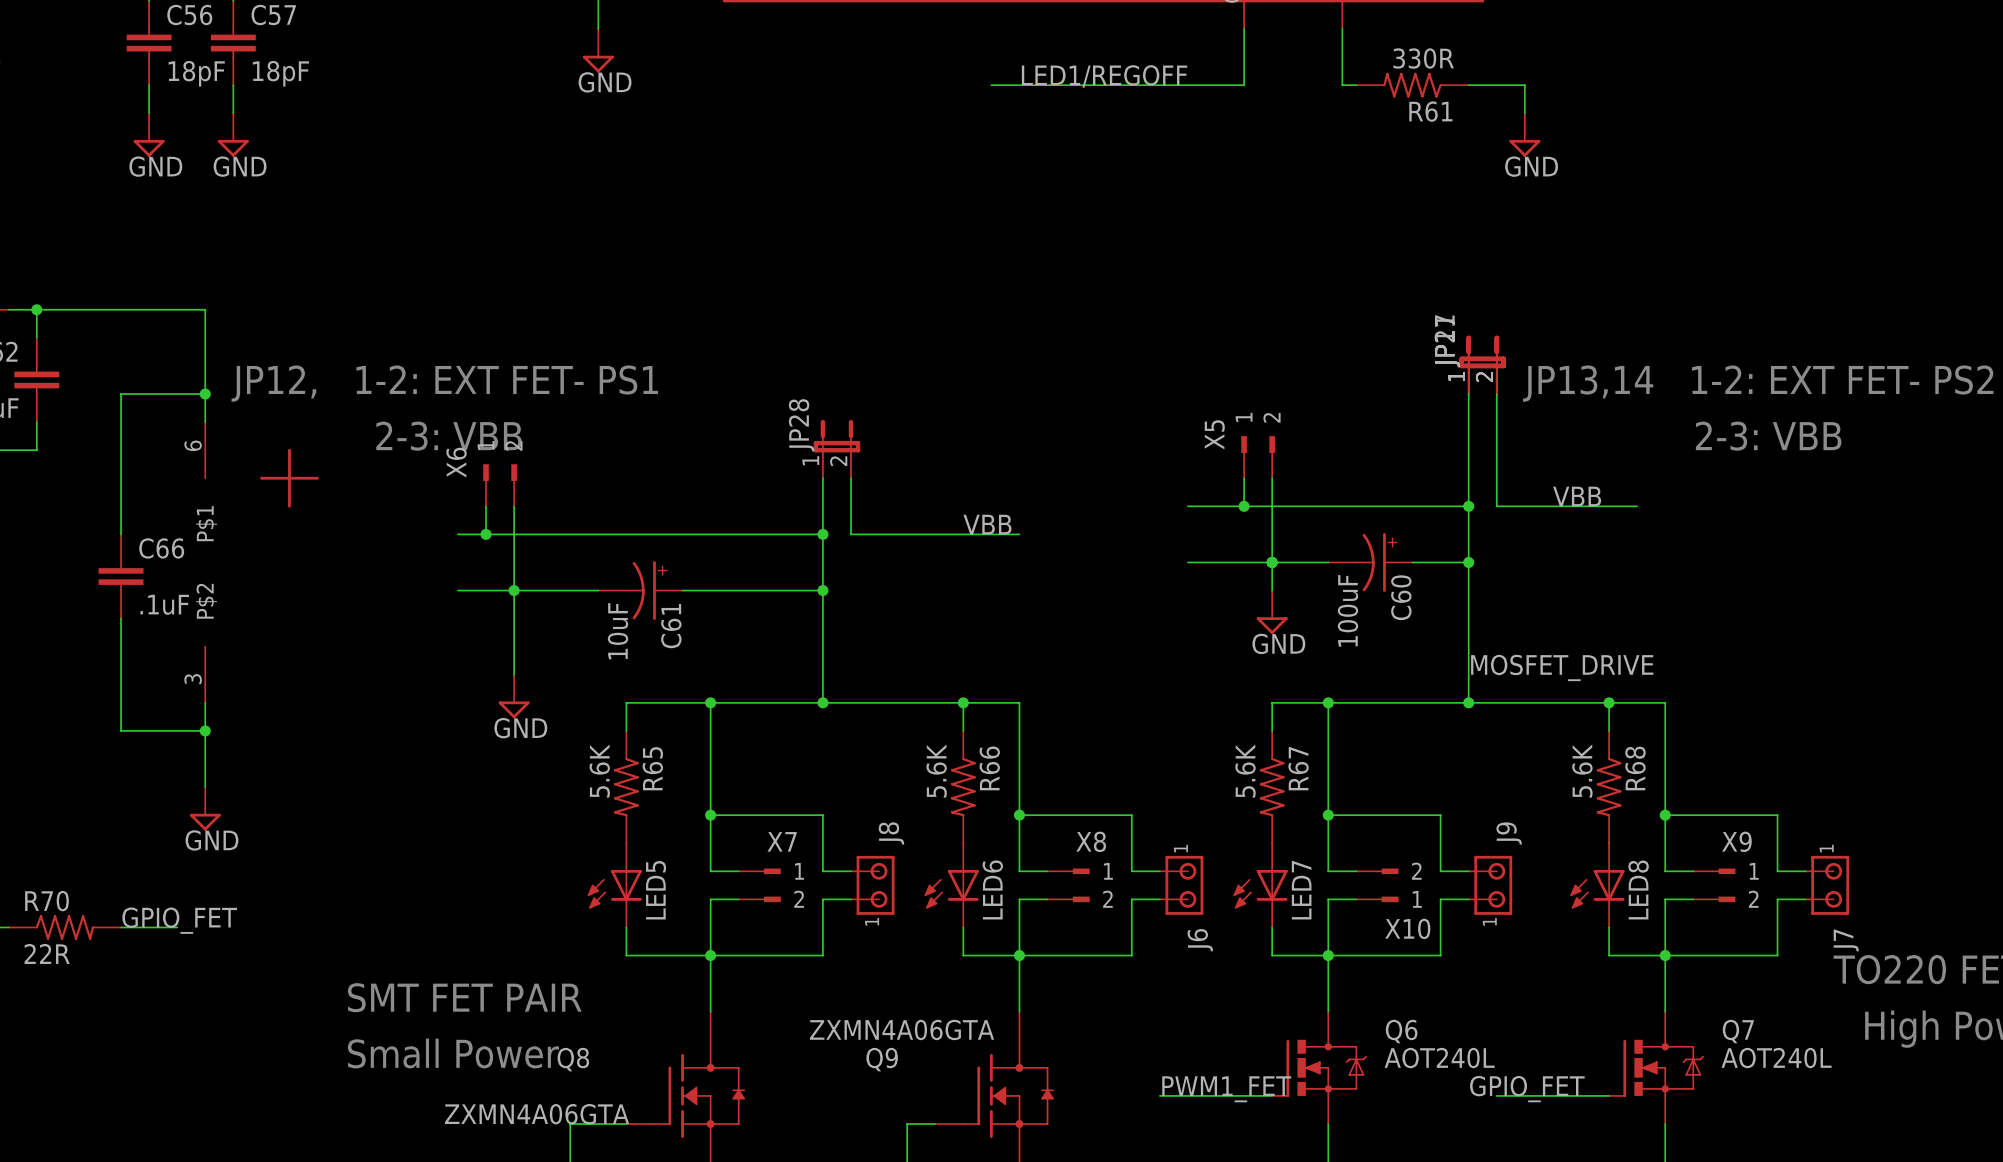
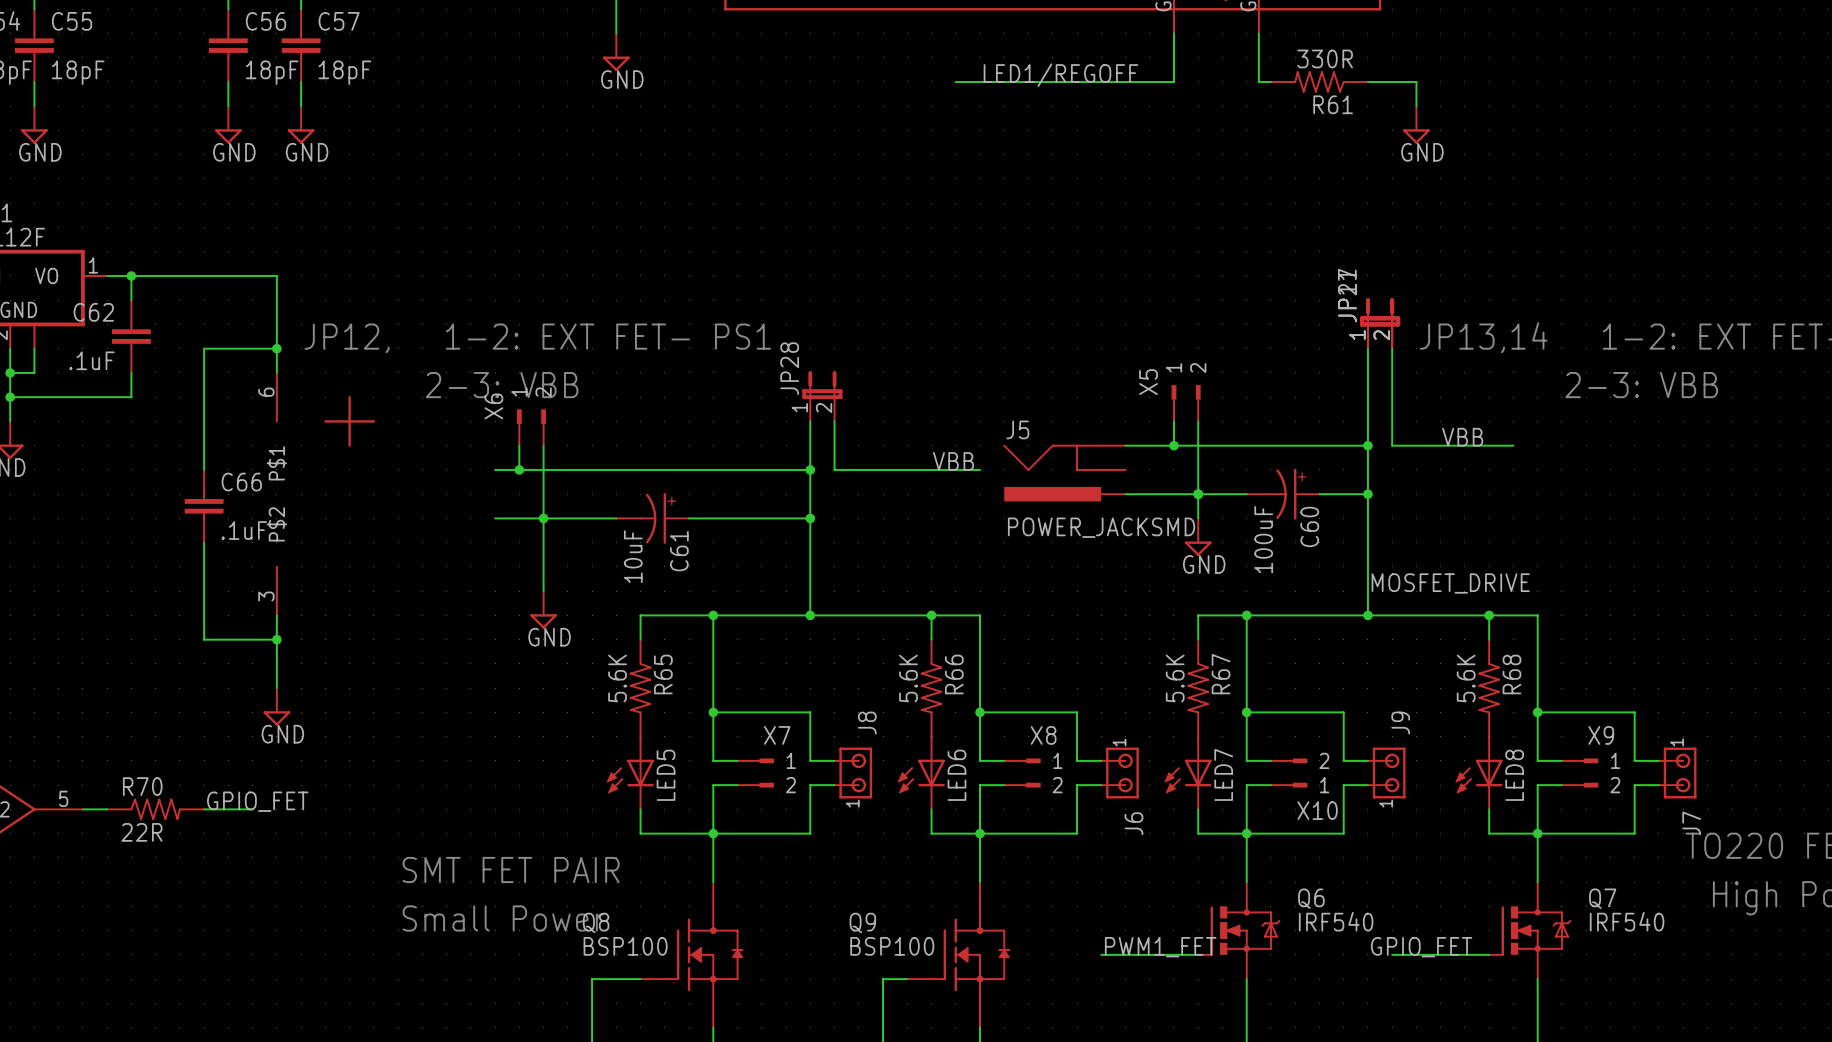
J5: none -> POWER_JACKSMD (1064, 473)
Q9 value: ZXMN4A06GTA (902, 1029) -> BSP100 (892, 946)
Q6 value: AOT240L (1439, 1058) -> IRF540 (1336, 921)
Q7 value: AOT240L (1776, 1058) -> IRF540 (1627, 921)
Q8 value: ZXMN4A06GTA (537, 1114) -> BSP100 (625, 946)

